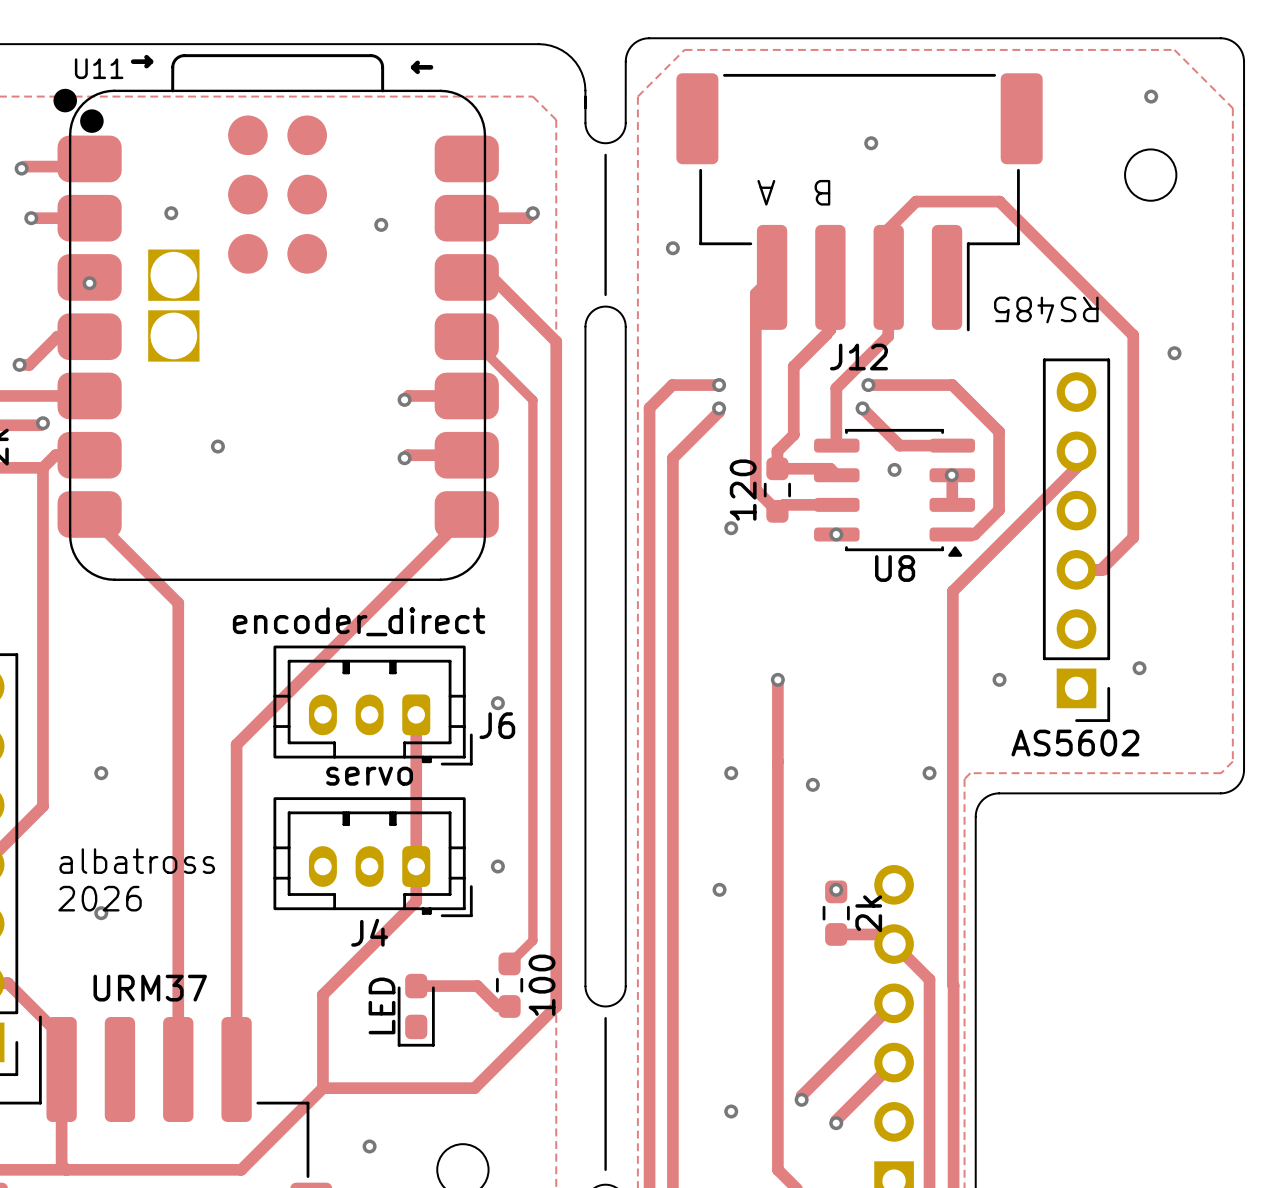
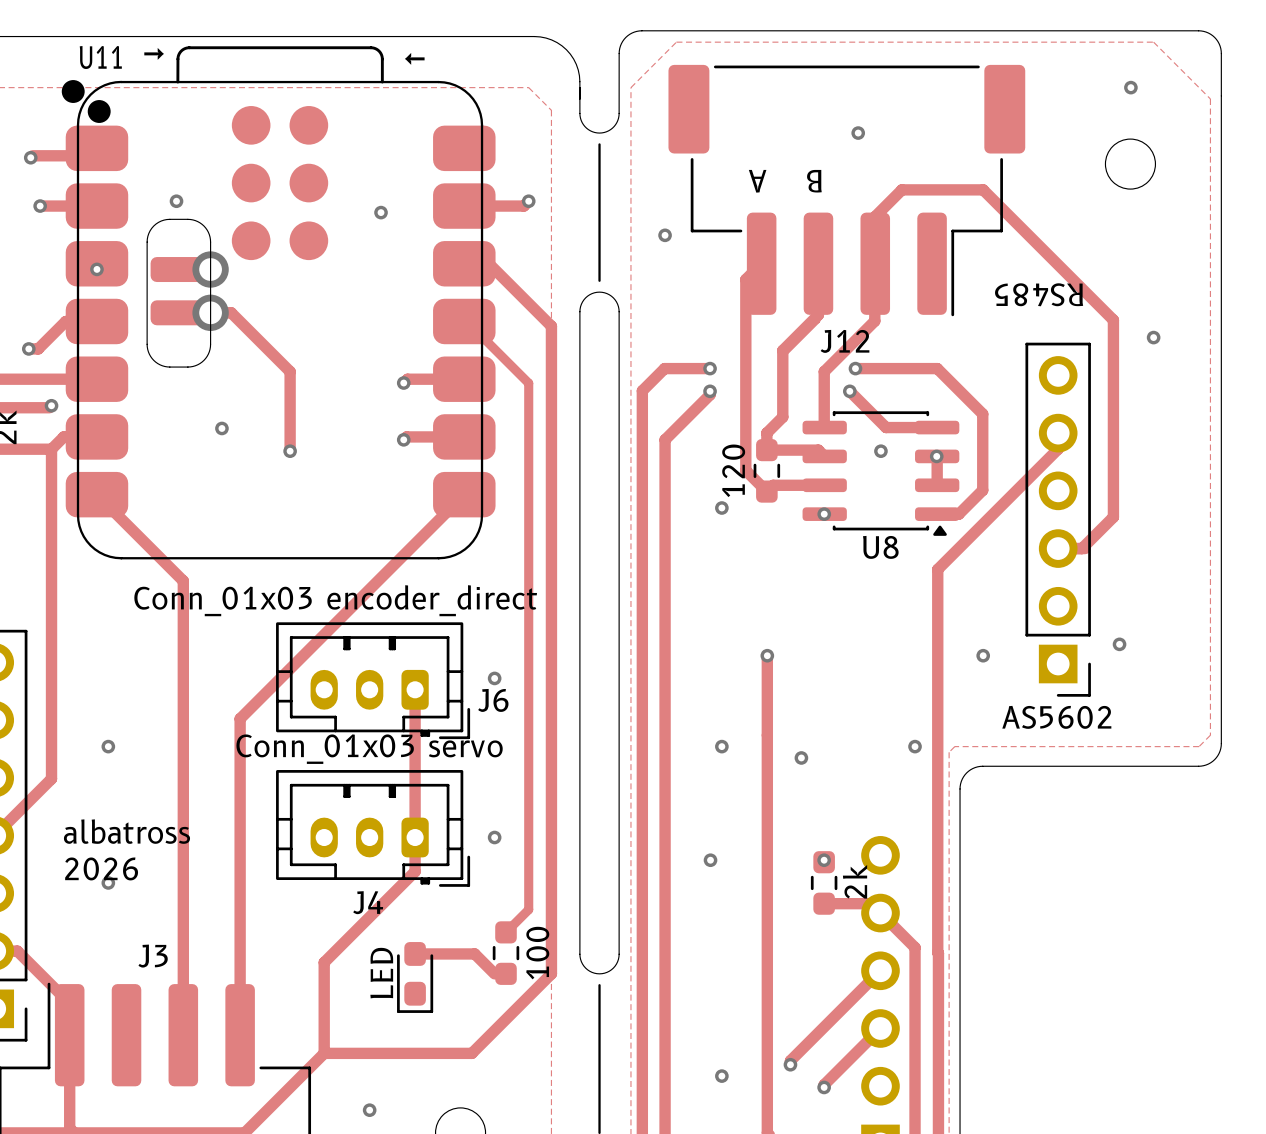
U11 footprint: [53, 54, 499, 581] -> [61, 46, 496, 560]
via: none -> (210, 269)
via: none -> (210, 312)
track: none -> (216, 312) (231, 312) (290, 371) (290, 451)
board edge: none -> (187, 367) (190, 366) (192, 366) (195, 365) (202, 362) (210, 349) (210, 239) (205, 227) (197, 221) (190, 219) (166, 219) (153, 226) (147, 239) (147, 346) (152, 358) (159, 364) (167, 366) (169, 367) (187, 367)
via: none -> (290, 451)
J6 value: encoder_direct (359, 621) -> Conn_01x03 encoder_direct (335, 600)
J4 value: servo (369, 776) -> Conn_01x03 servo (369, 749)
J3 name: none -> J3 (153, 956)
J3 value: URM37 (150, 988) -> none

